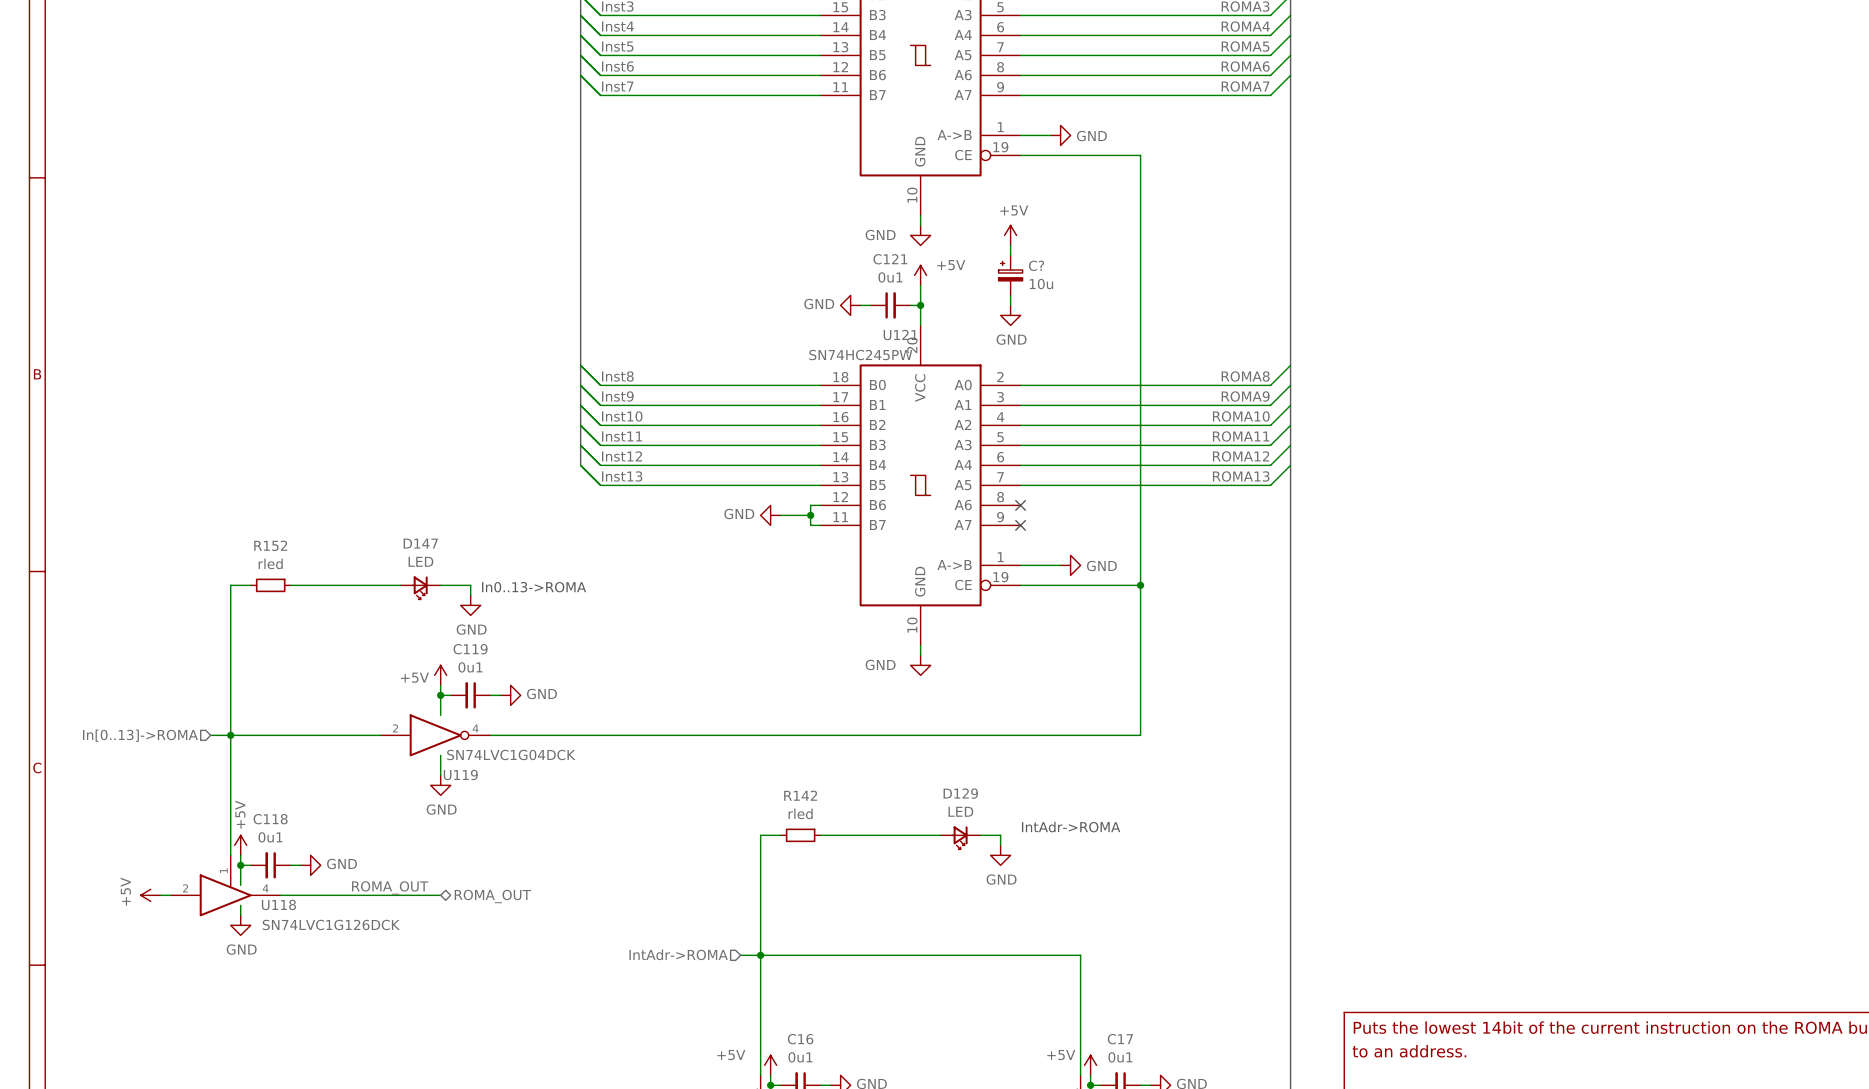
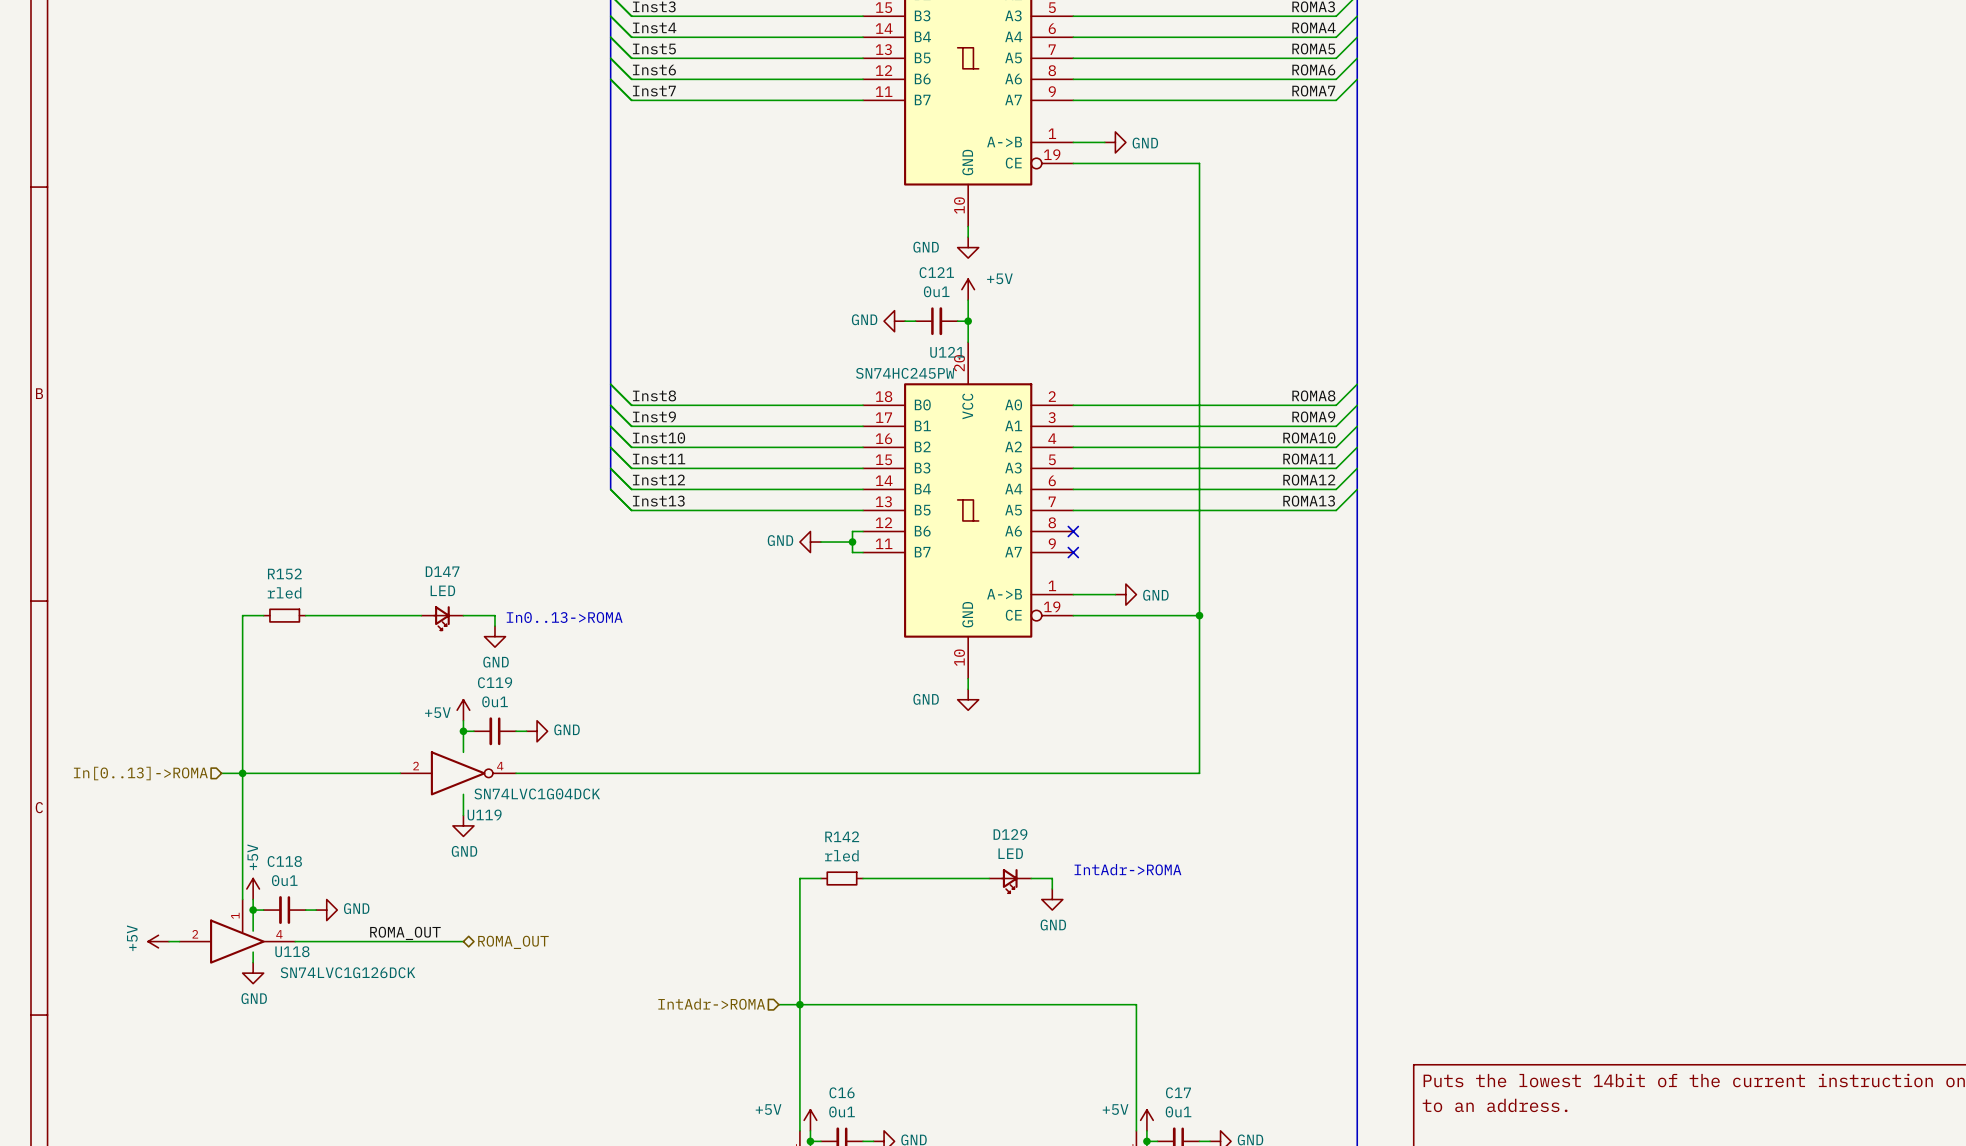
power symbol: +5V (1010, 235) -> none
wire: (1010, 245) (1010, 255) -> none
C?: 10u (1010, 275) -> none
wire: (1010, 295) (1010, 305) -> none
power symbol: GND (1010, 315) -> none

